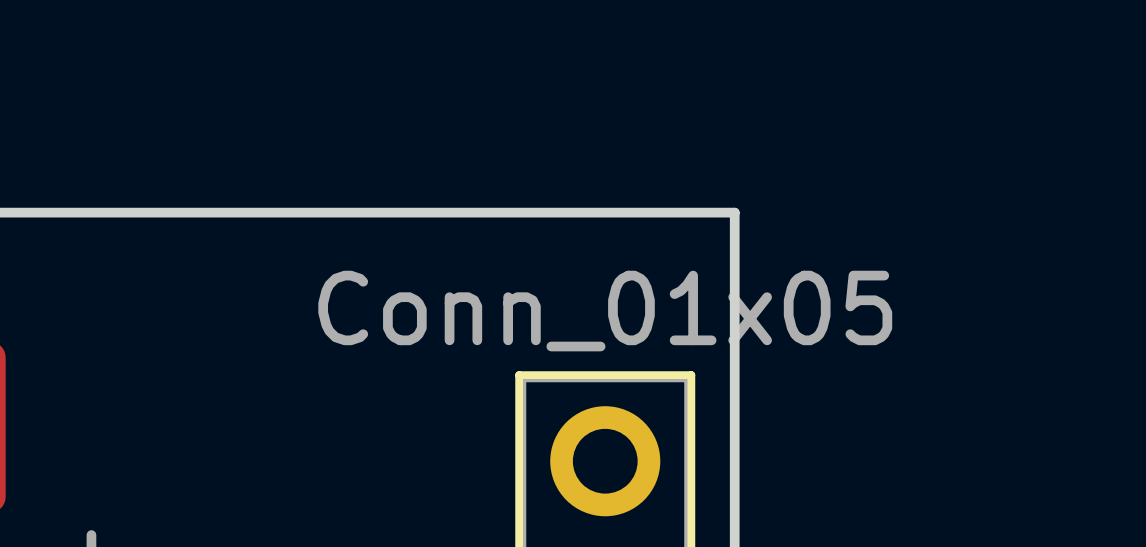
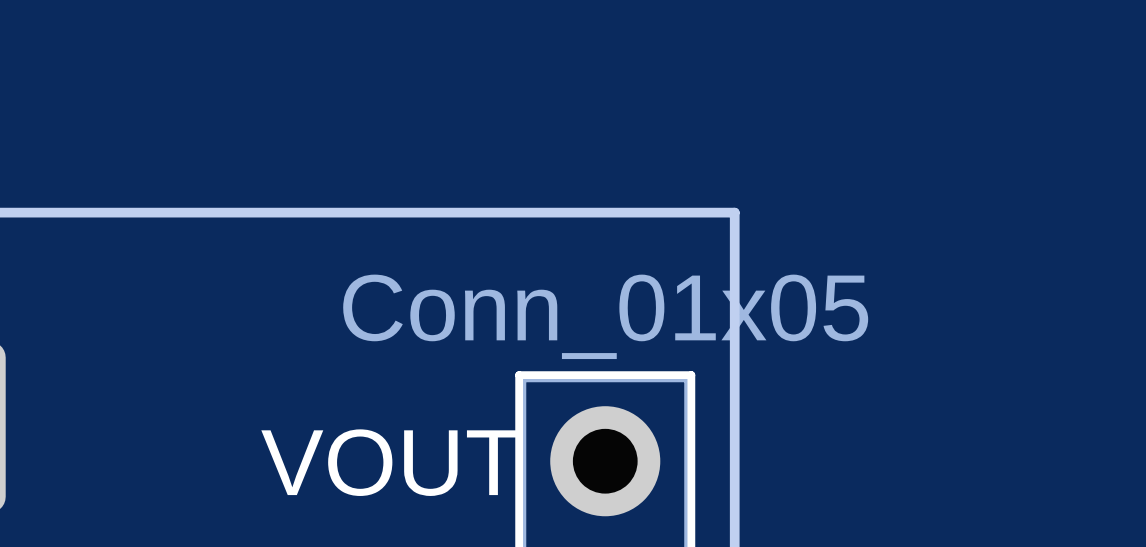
text: none -> VOUT (390, 462)

